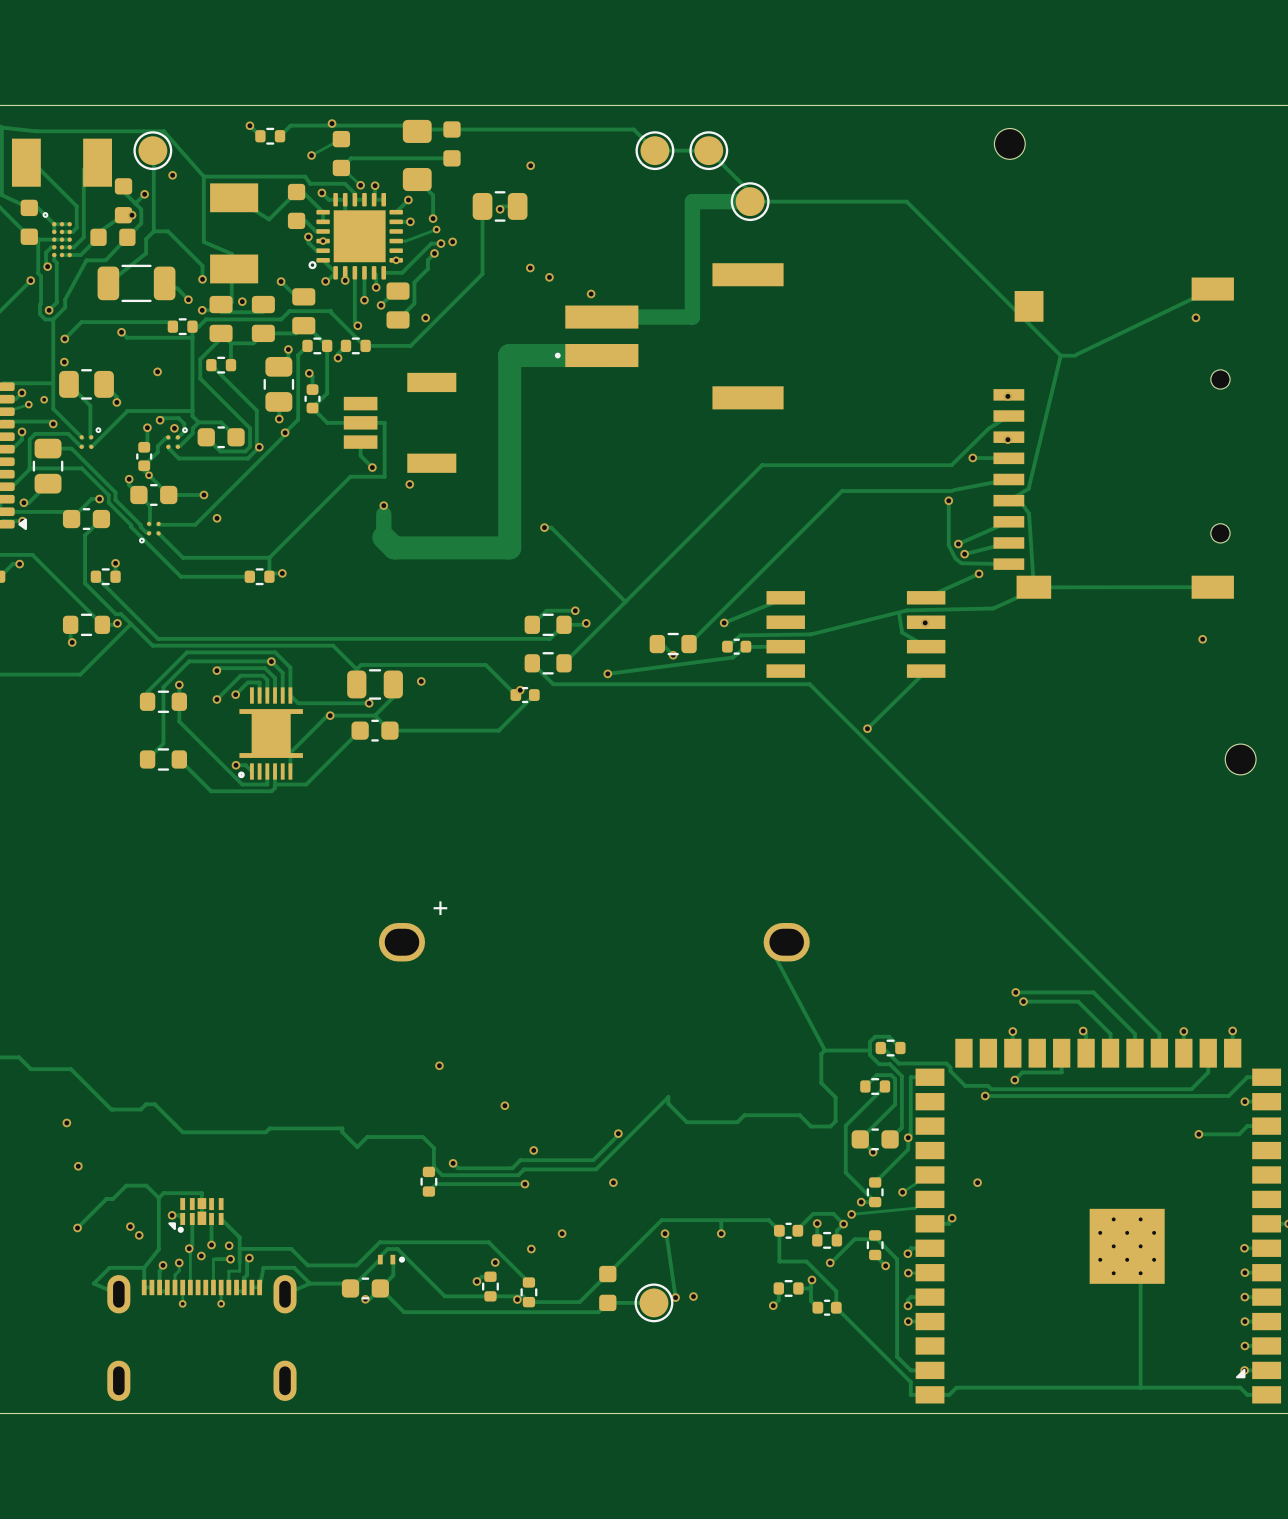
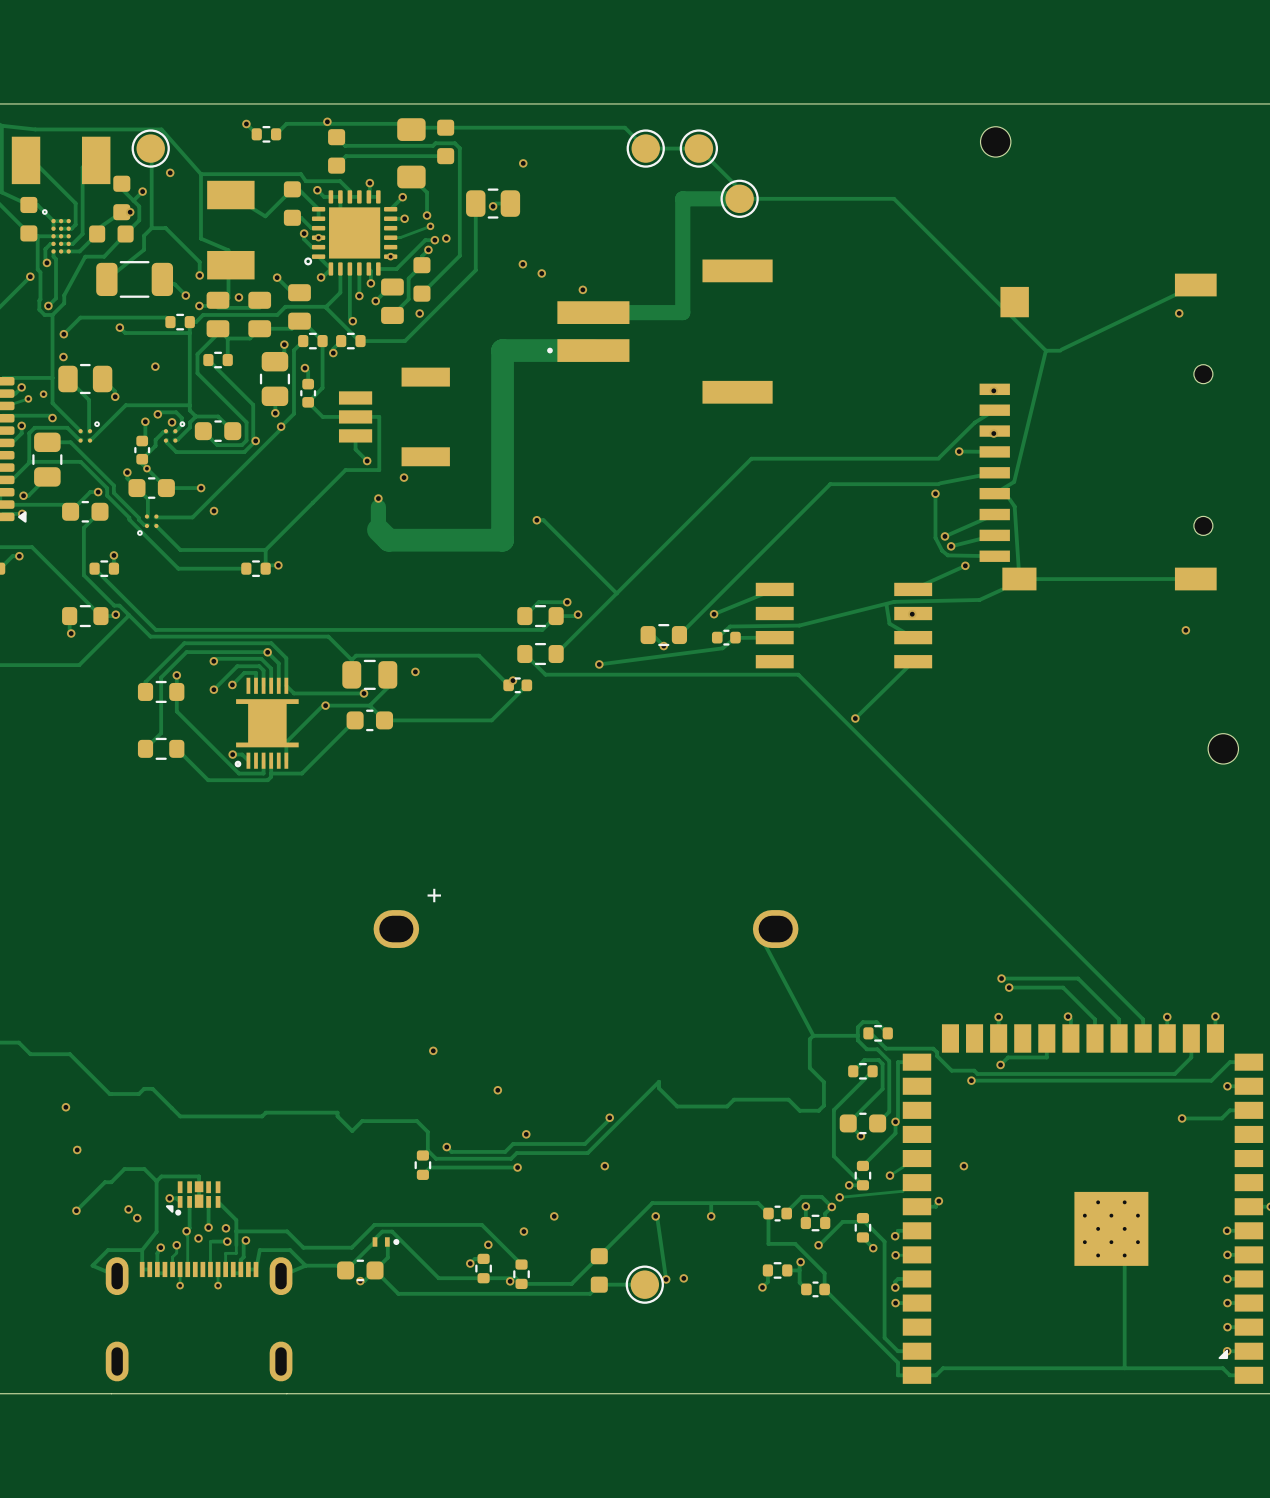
track: (341, 139) (311, 155) -> (336, 137) (345, 145) (433, 145) (435, 143) (454, 143) (459, 148) (459, 255) (421, 293)
via: (311, 155) -> none
track: (349, 174) (360, 185) -> none
via: (360, 185) -> none
track: none -> (340, 276) (340, 292) (326, 306)
via: (345, 280) -> none
part: none -> (421, 279)

